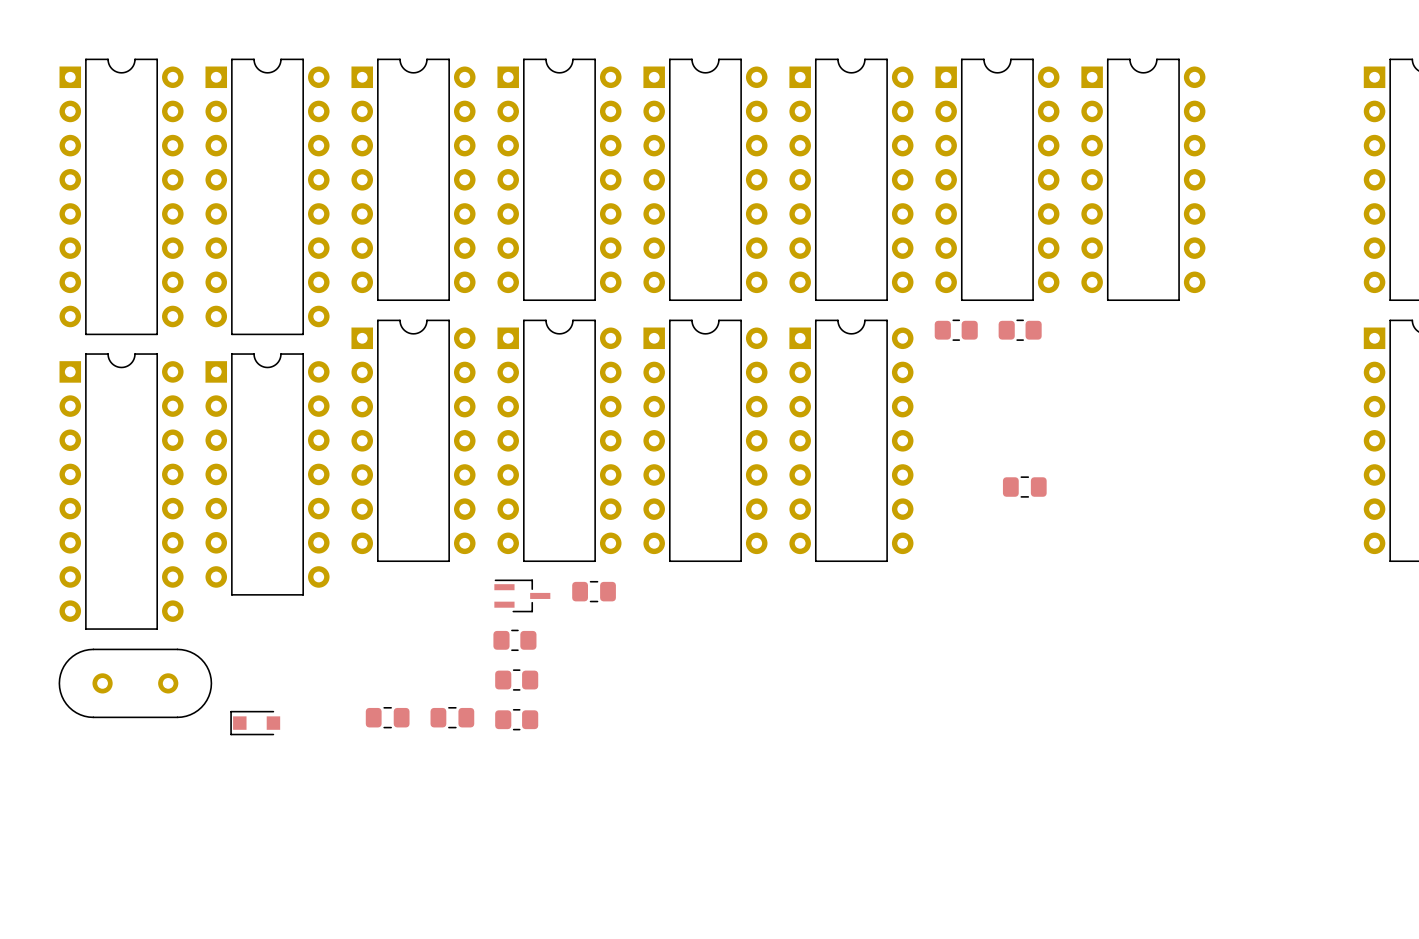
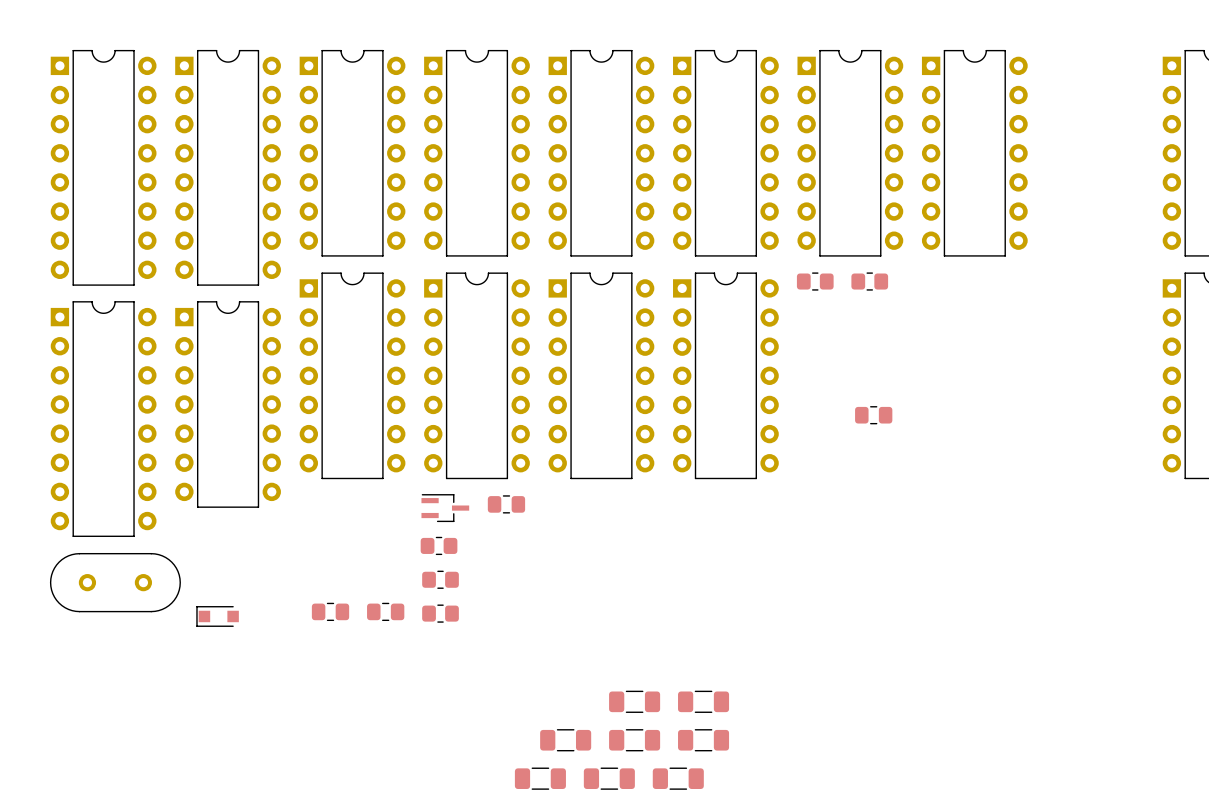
part: none -> (634, 701)
part: none -> (703, 701)
part: none -> (565, 740)
part: none -> (634, 740)
part: none -> (703, 740)
part: none -> (540, 778)
part: none -> (609, 778)
part: none -> (678, 778)

